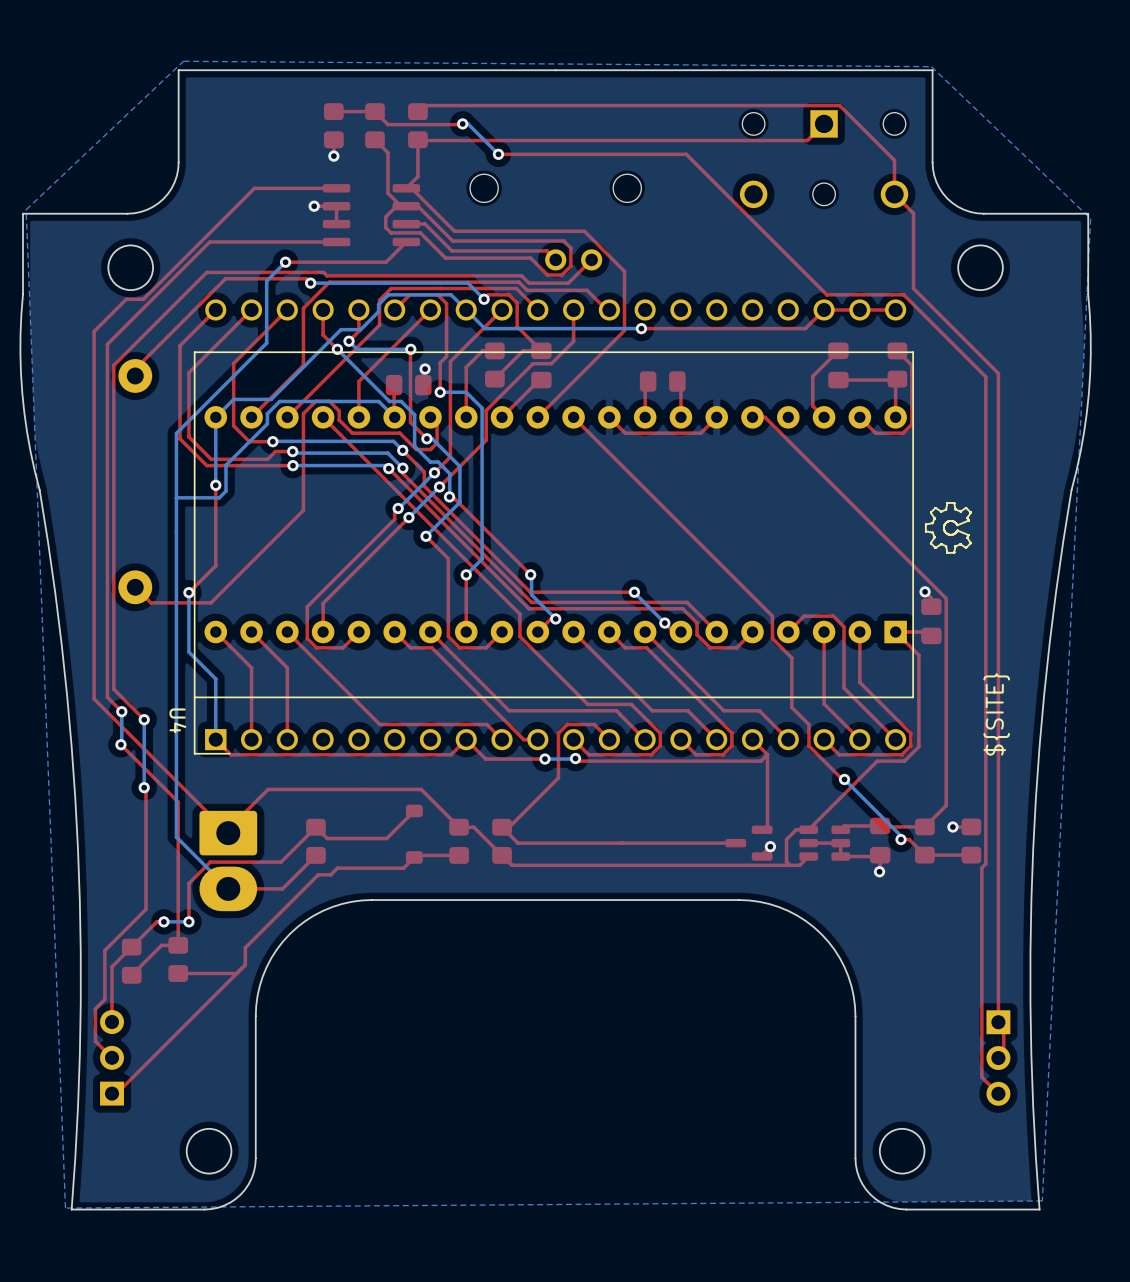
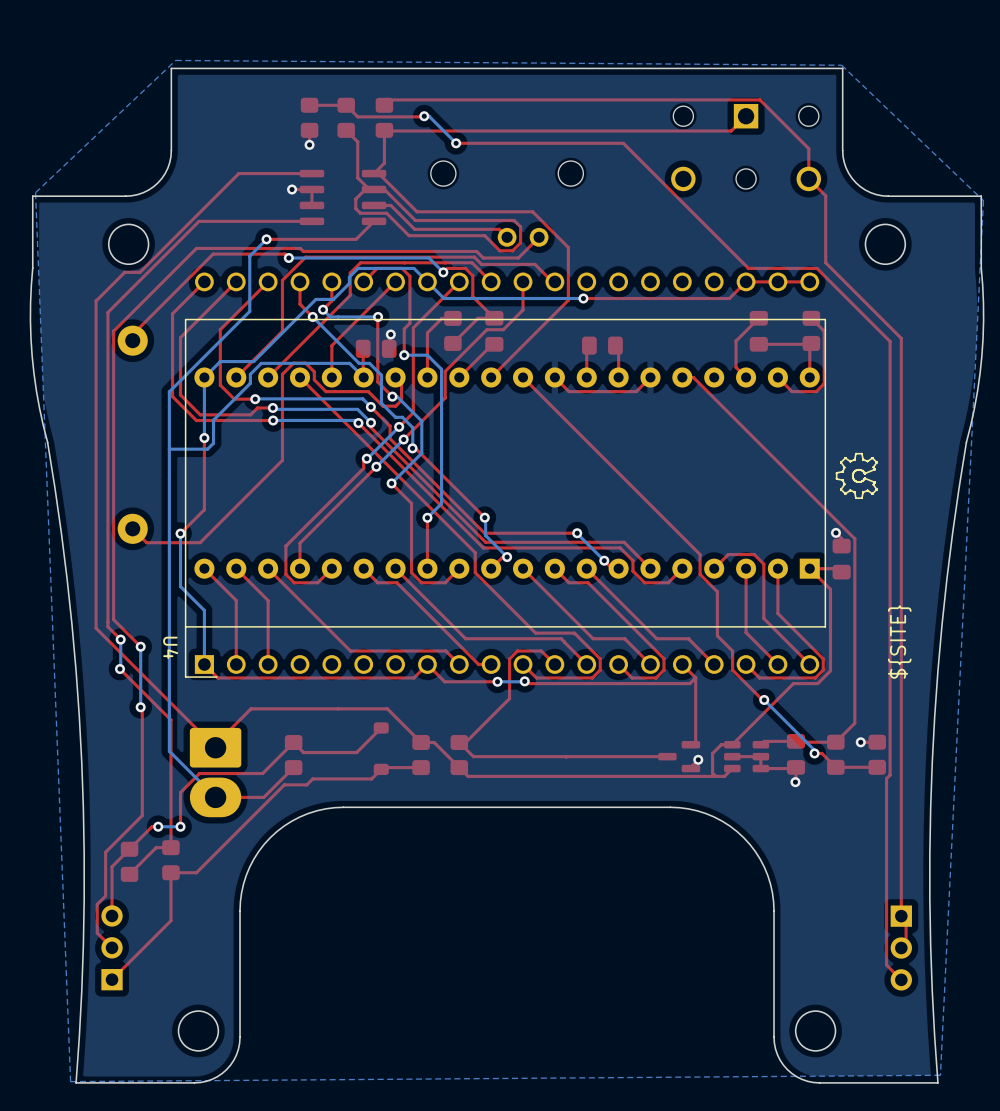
top track: (318, 874) (245, 947) (245, 964) (116, 1093) -> none
top track: none -> (170, 872) (170, 920) (112, 979)
top track: (236, 973) (206, 973) -> (295, 784) (284, 784) (196, 872)

